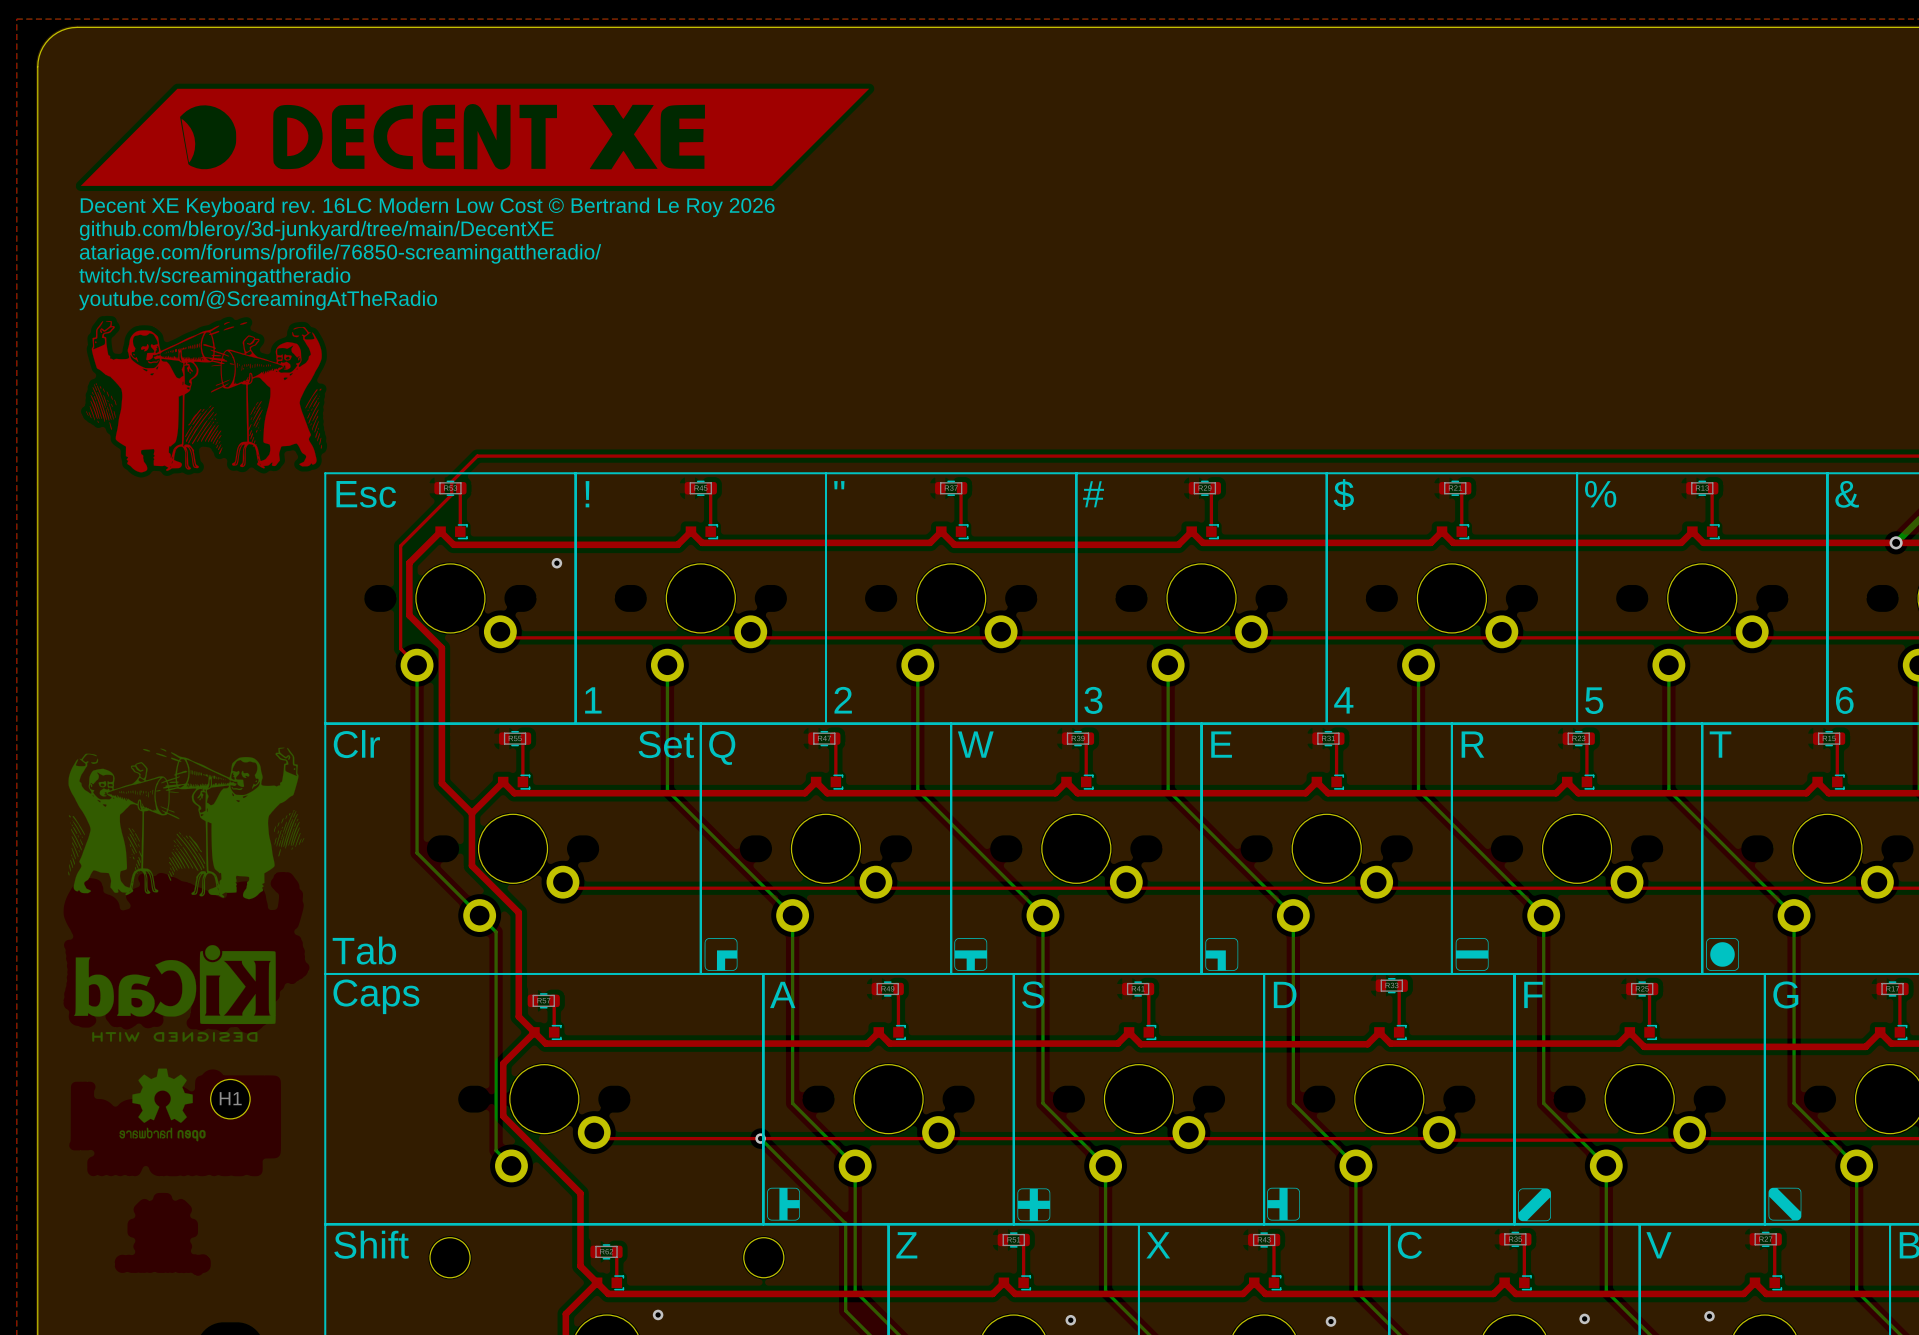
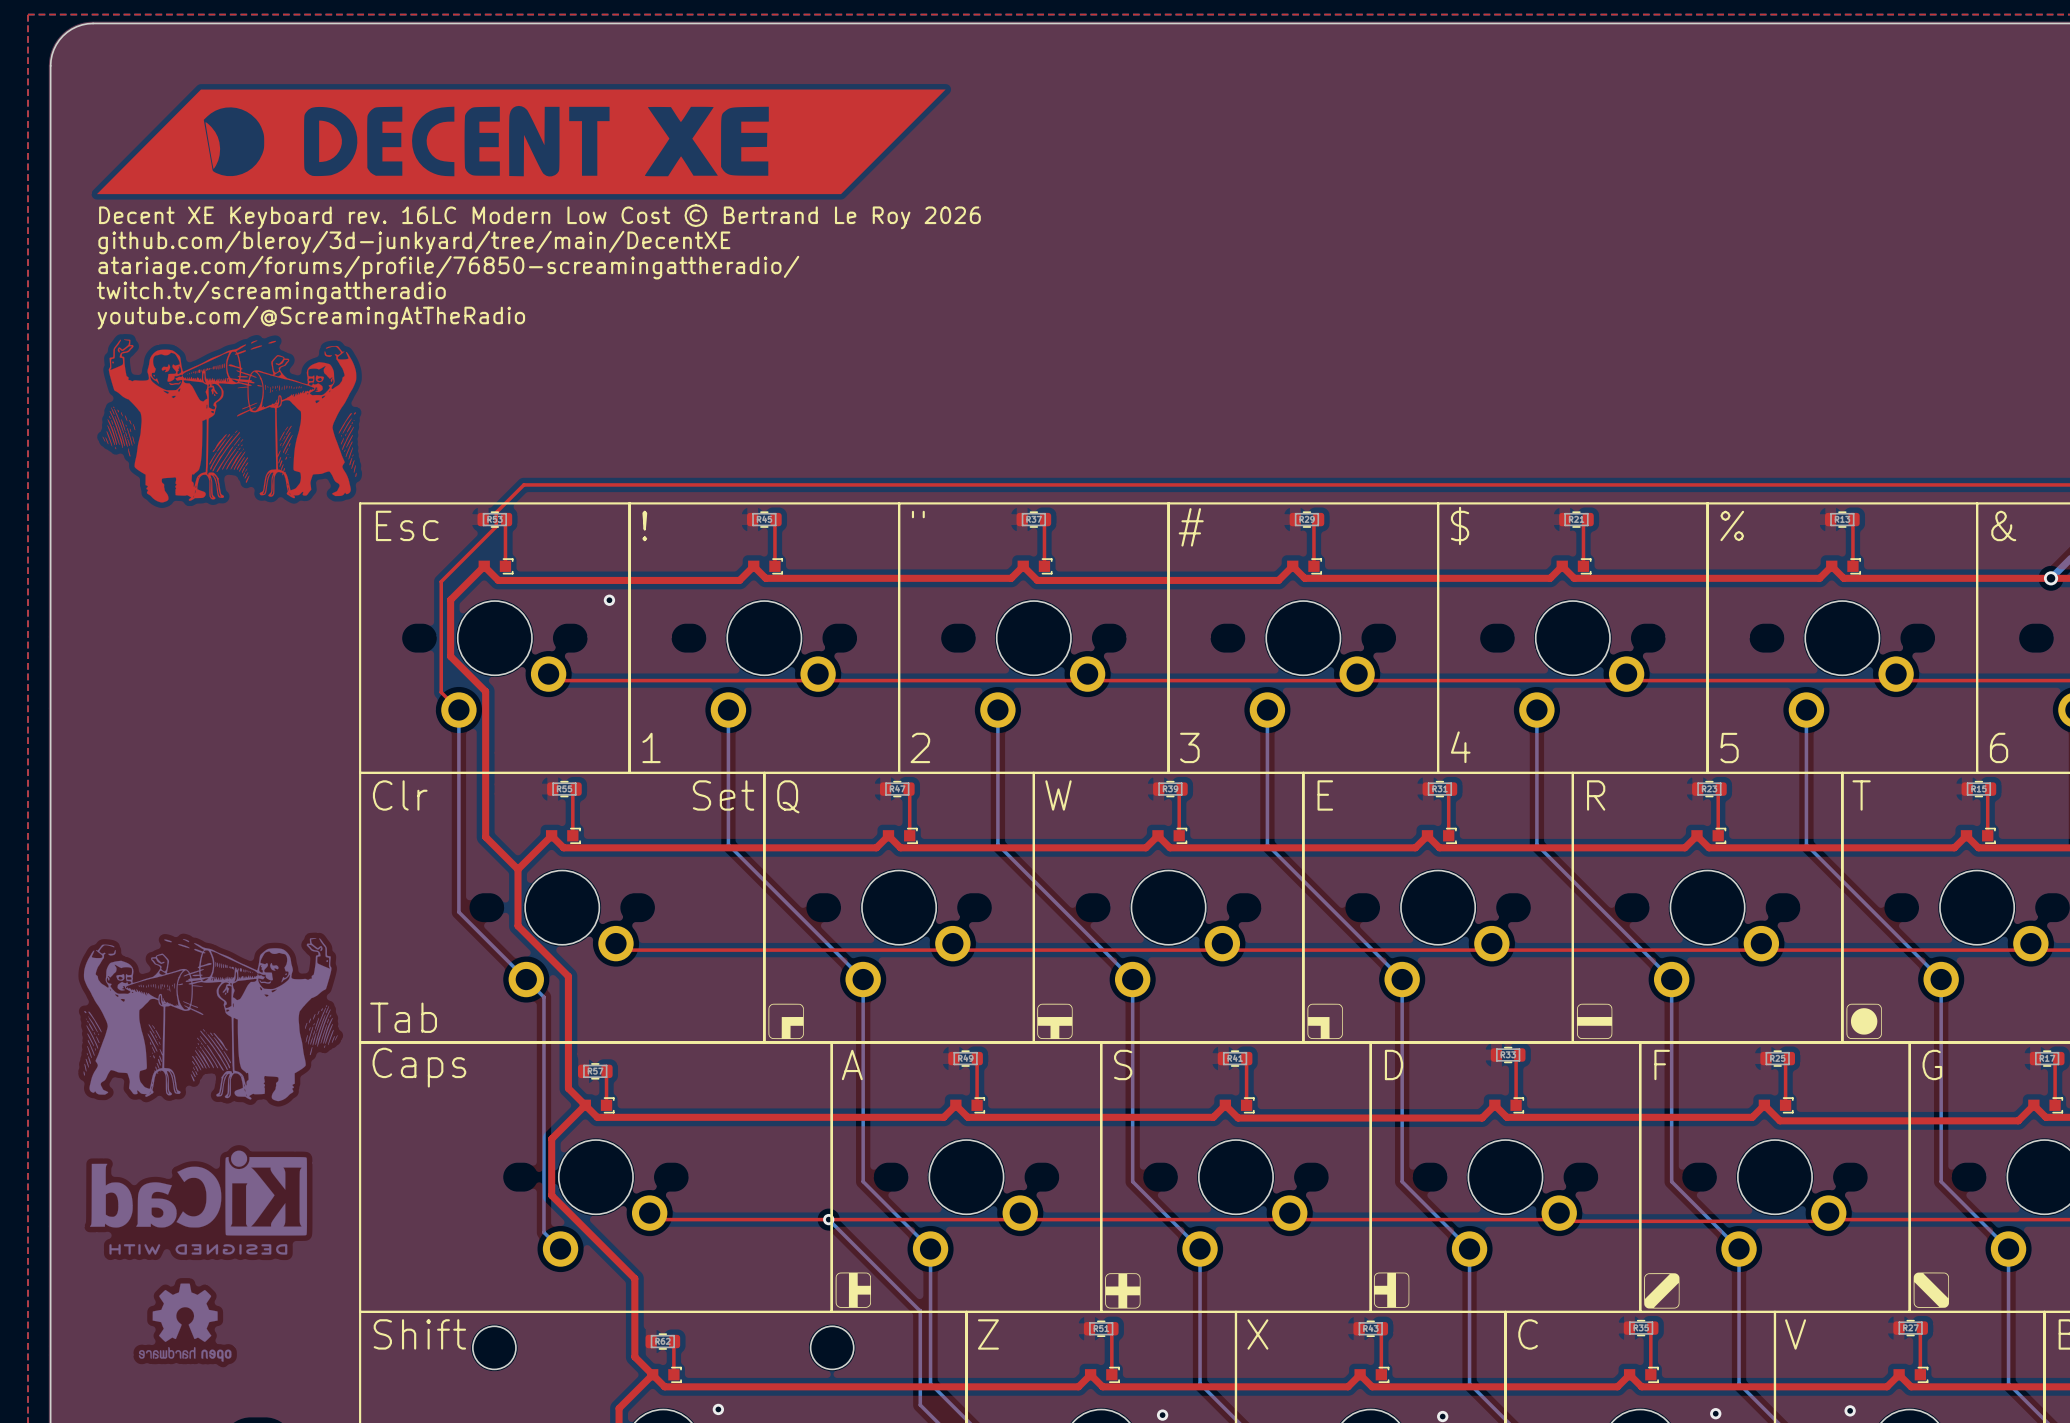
drawing position: (186, 823) -> (210, 1019)
drawing position: (174, 993) -> (198, 1202)
H1: (230, 1099) -> none
drawing position: (162, 1104) -> (185, 1322)

